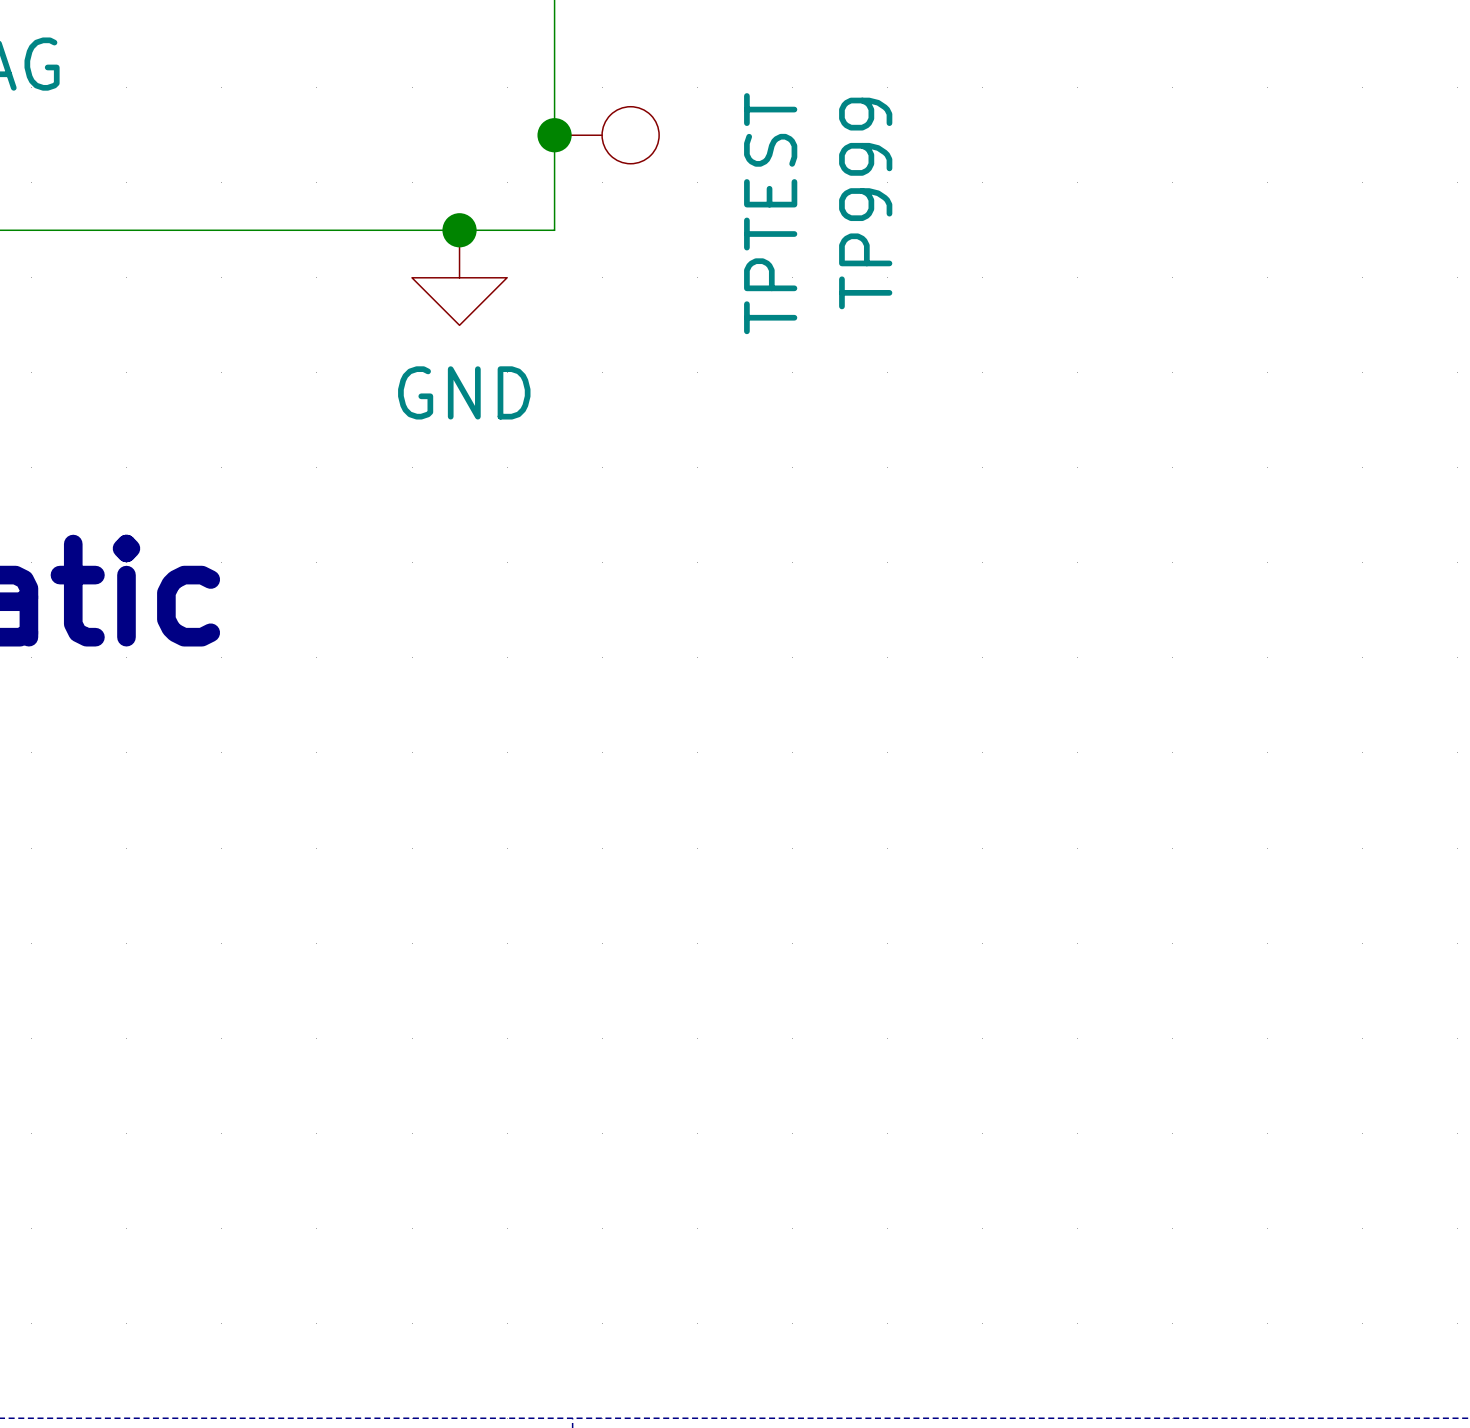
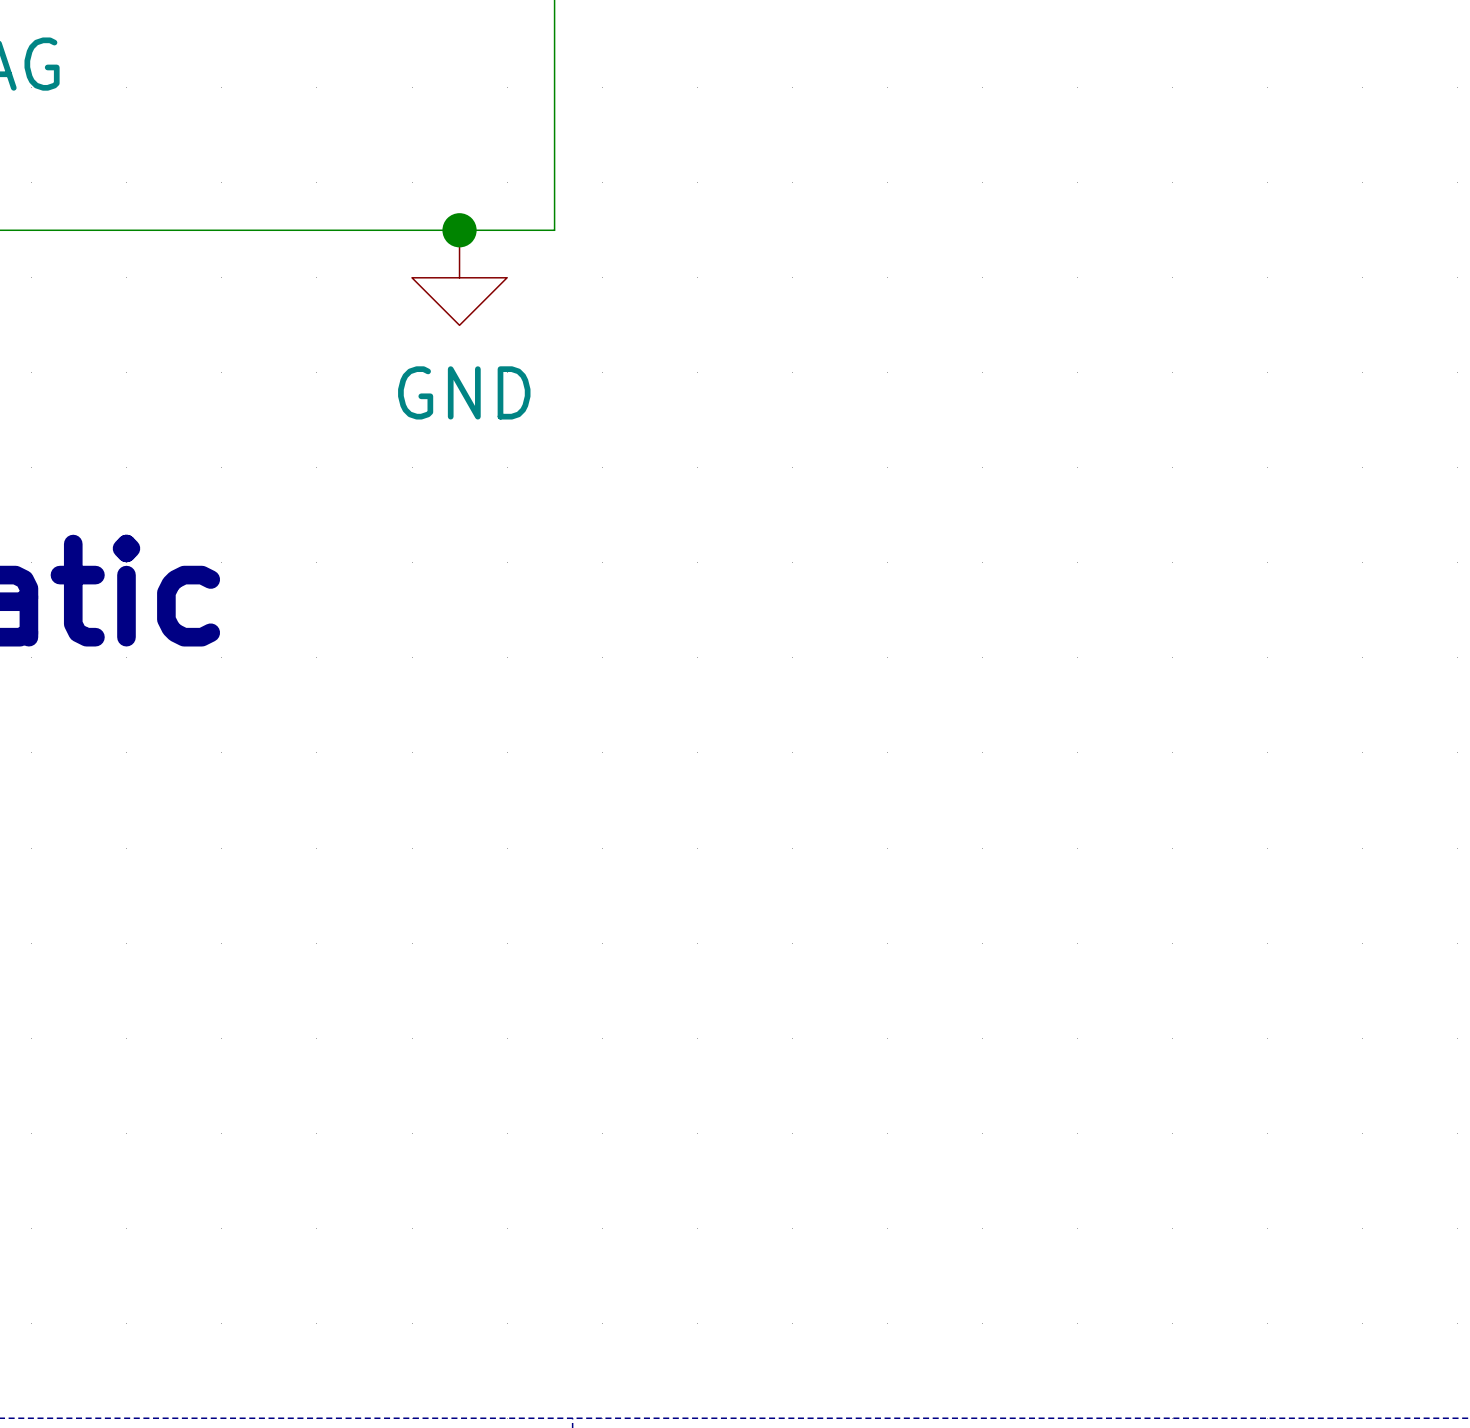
junction: (554, 135) -> none
TP999: (606, 135) -> none

